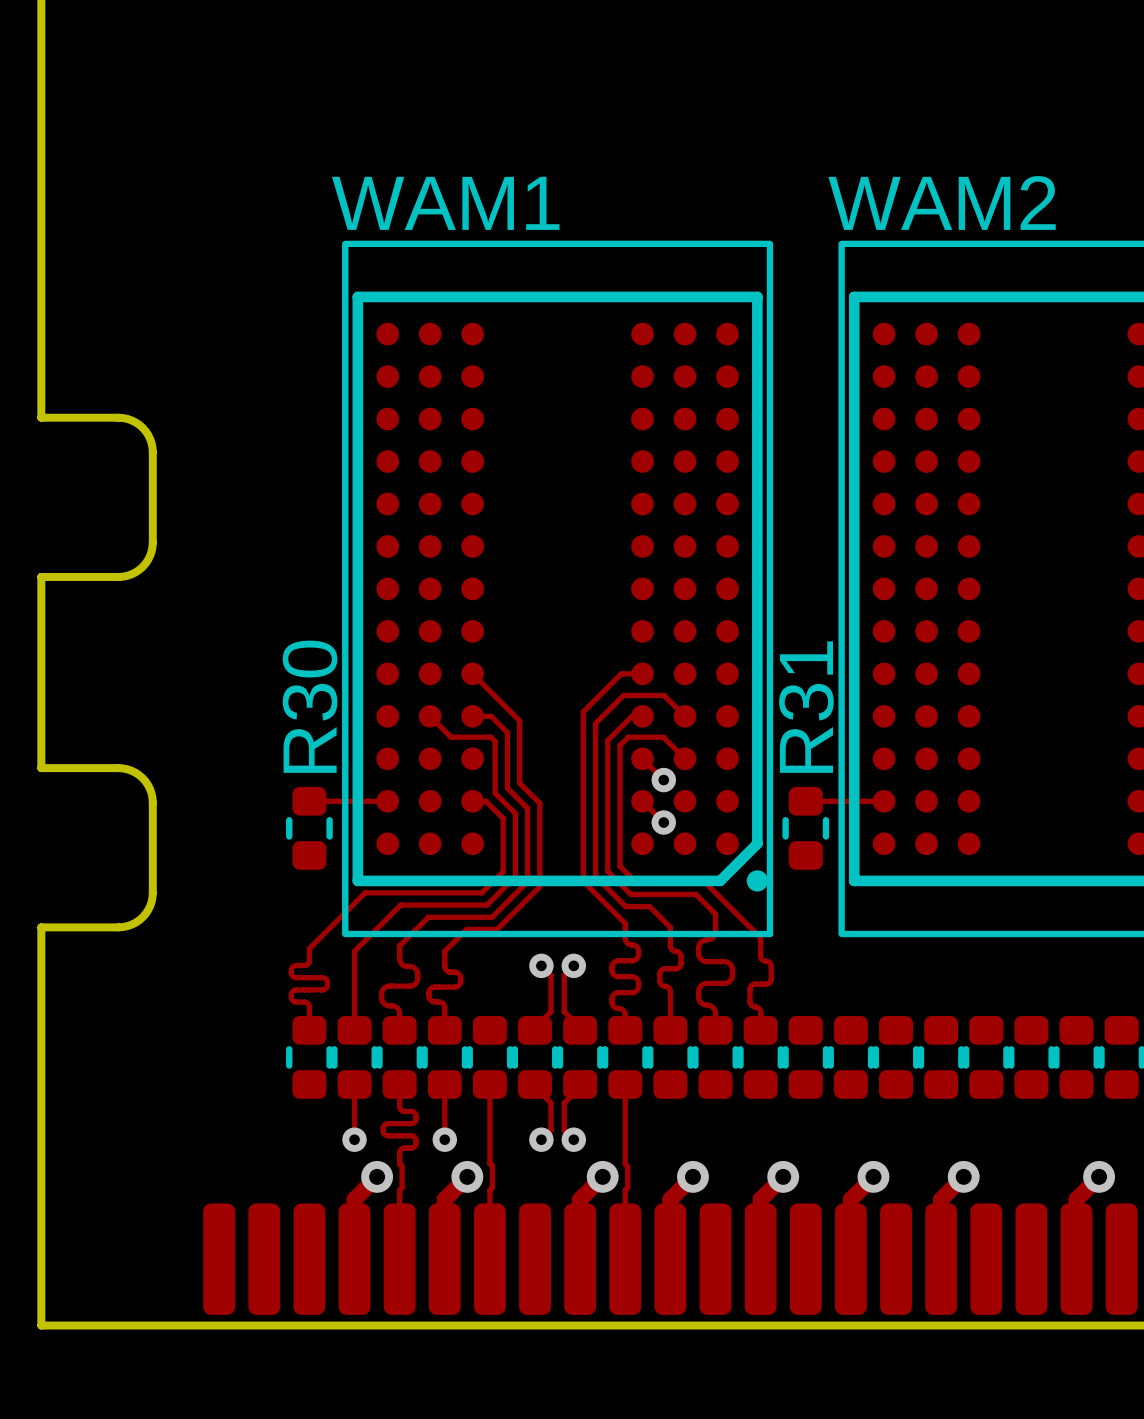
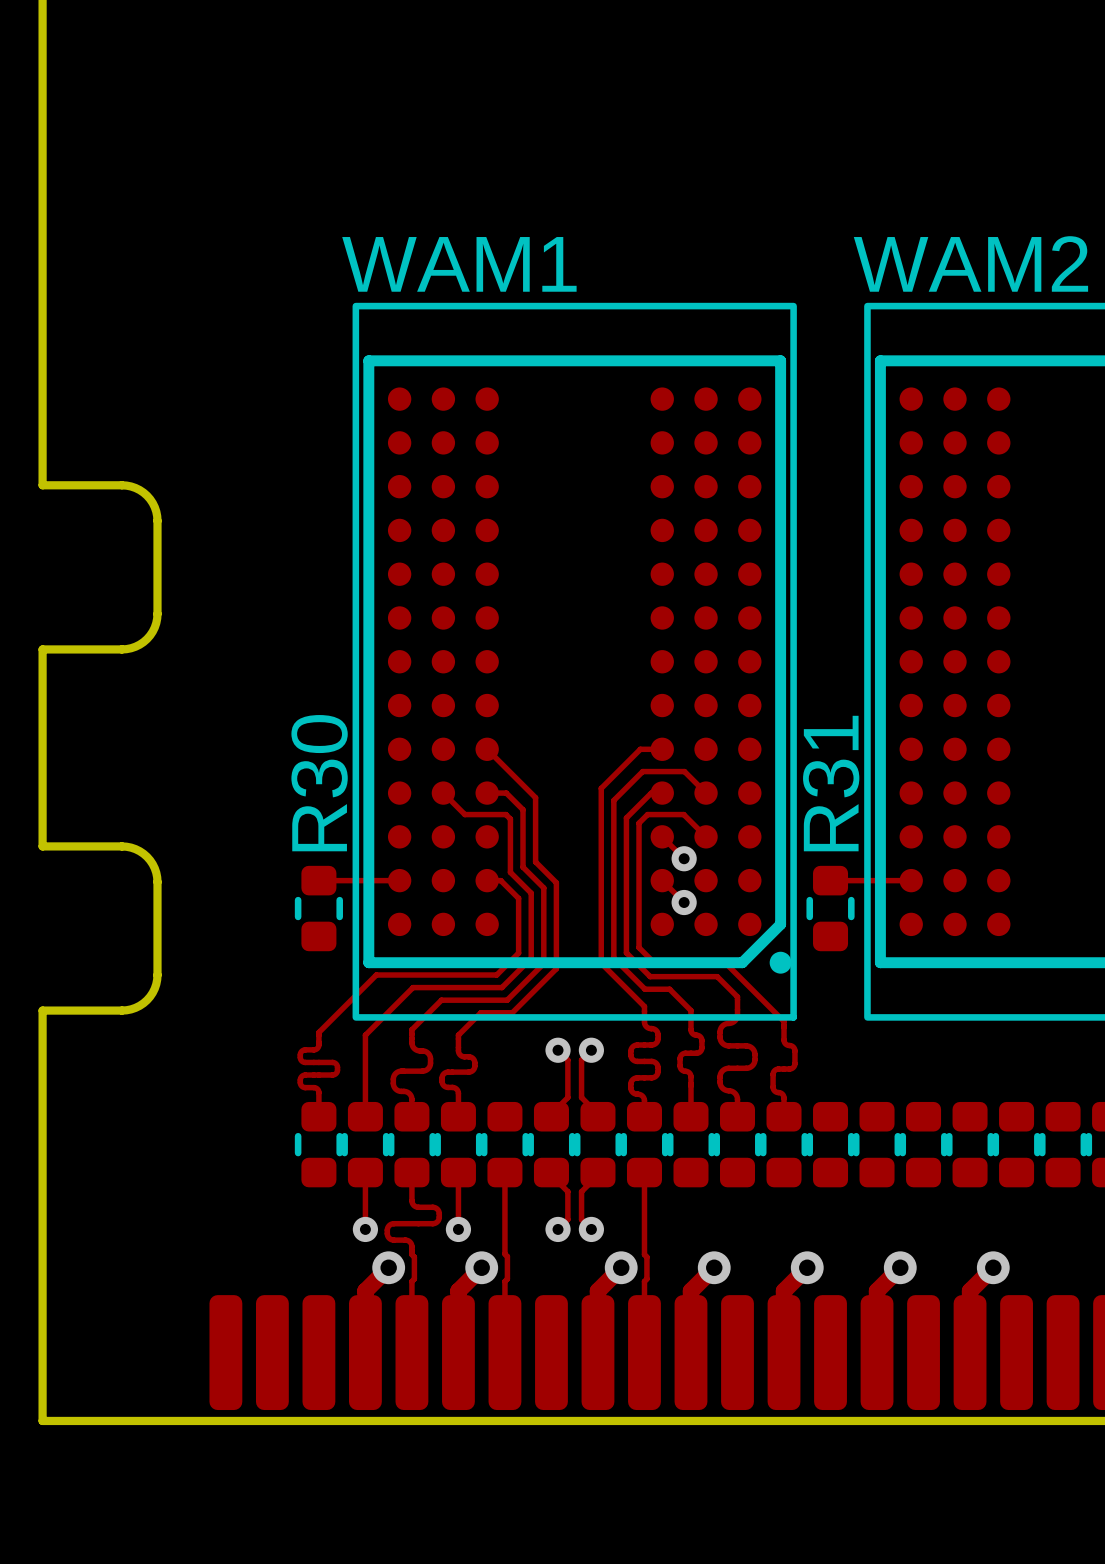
track: (399, 1106) (402, 1111) (413, 1112) (416, 1116) (412, 1123) (387, 1123) (383, 1126) (383, 1132) (386, 1135) (411, 1135) (415, 1138) (414, 1146) (401, 1148) (399, 1156) -> (411, 1195) (412, 1202) (415, 1206) (434, 1207) (439, 1213) (438, 1219) (434, 1223) (393, 1223) (388, 1226) (387, 1234) (389, 1238) (407, 1240) (411, 1246)

